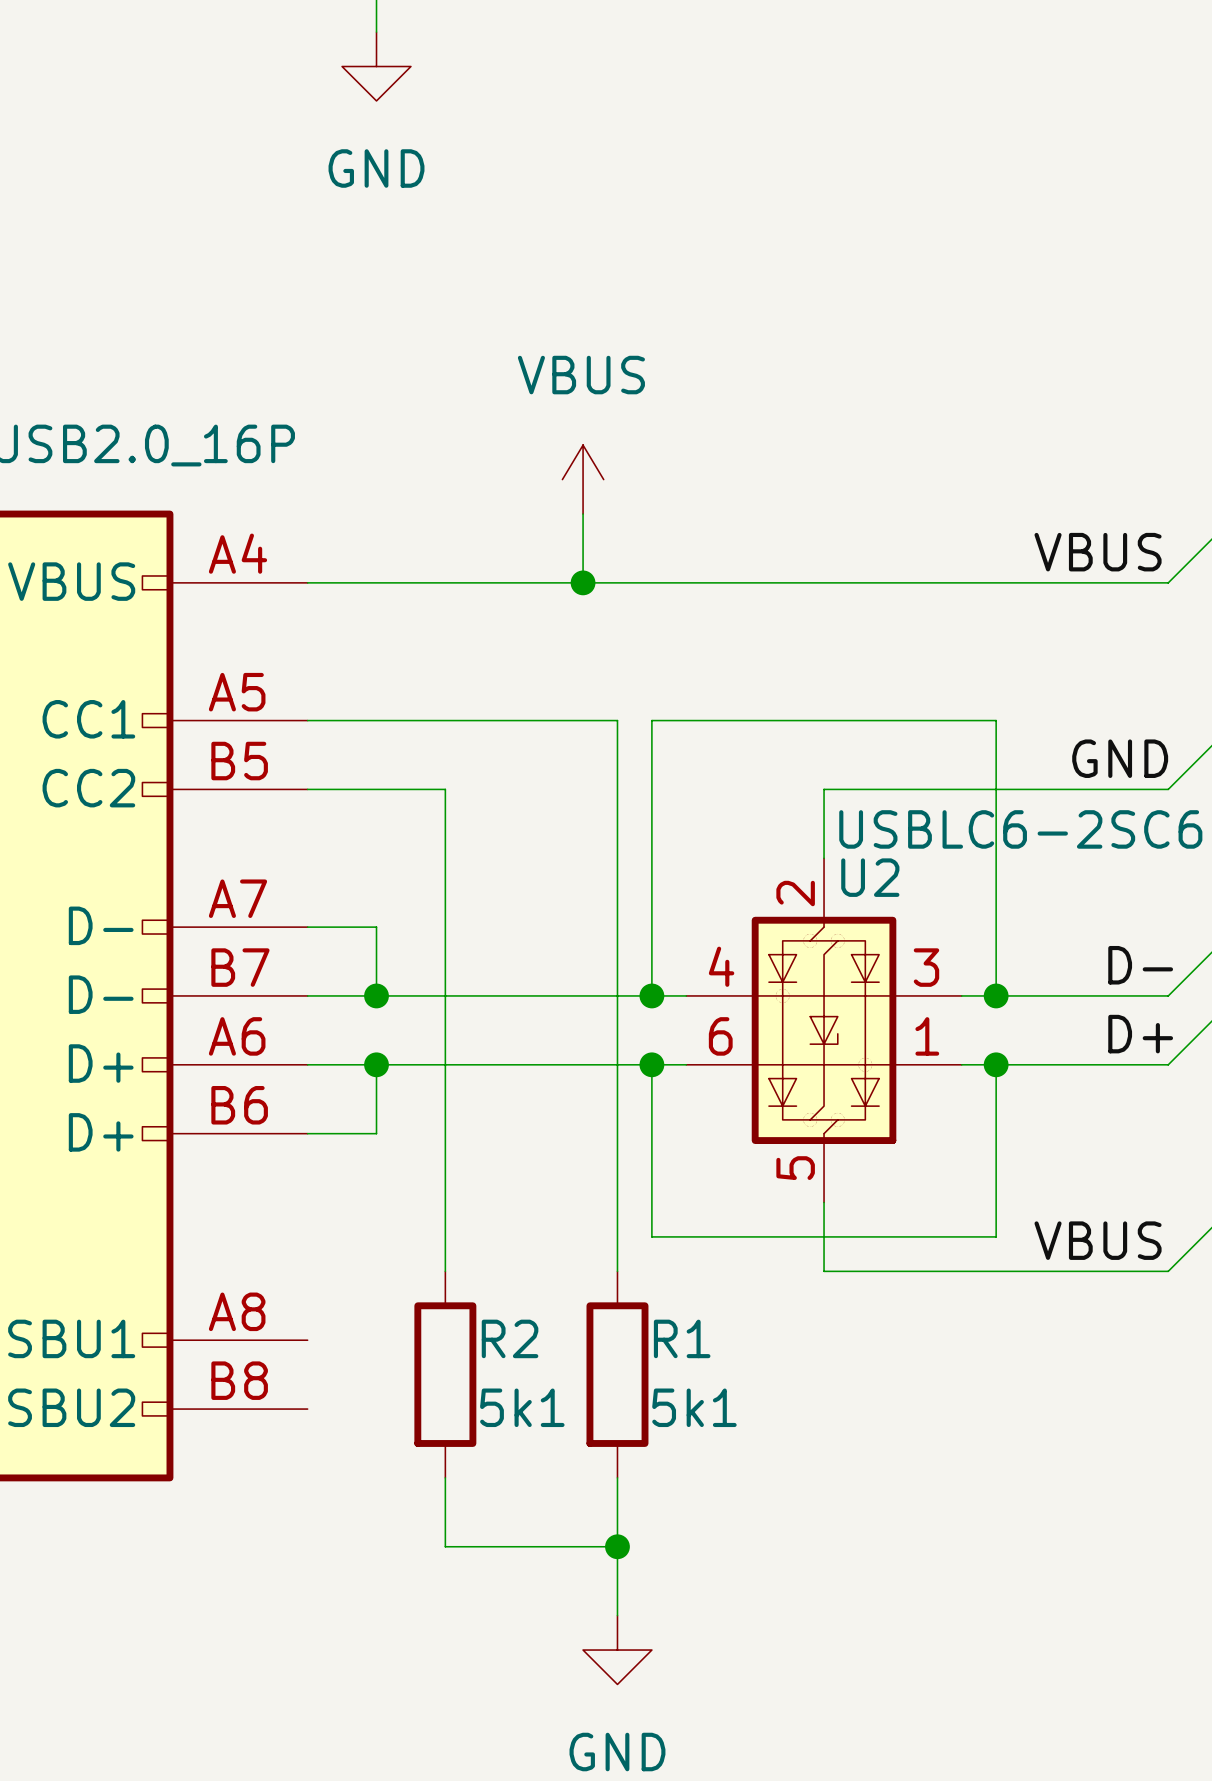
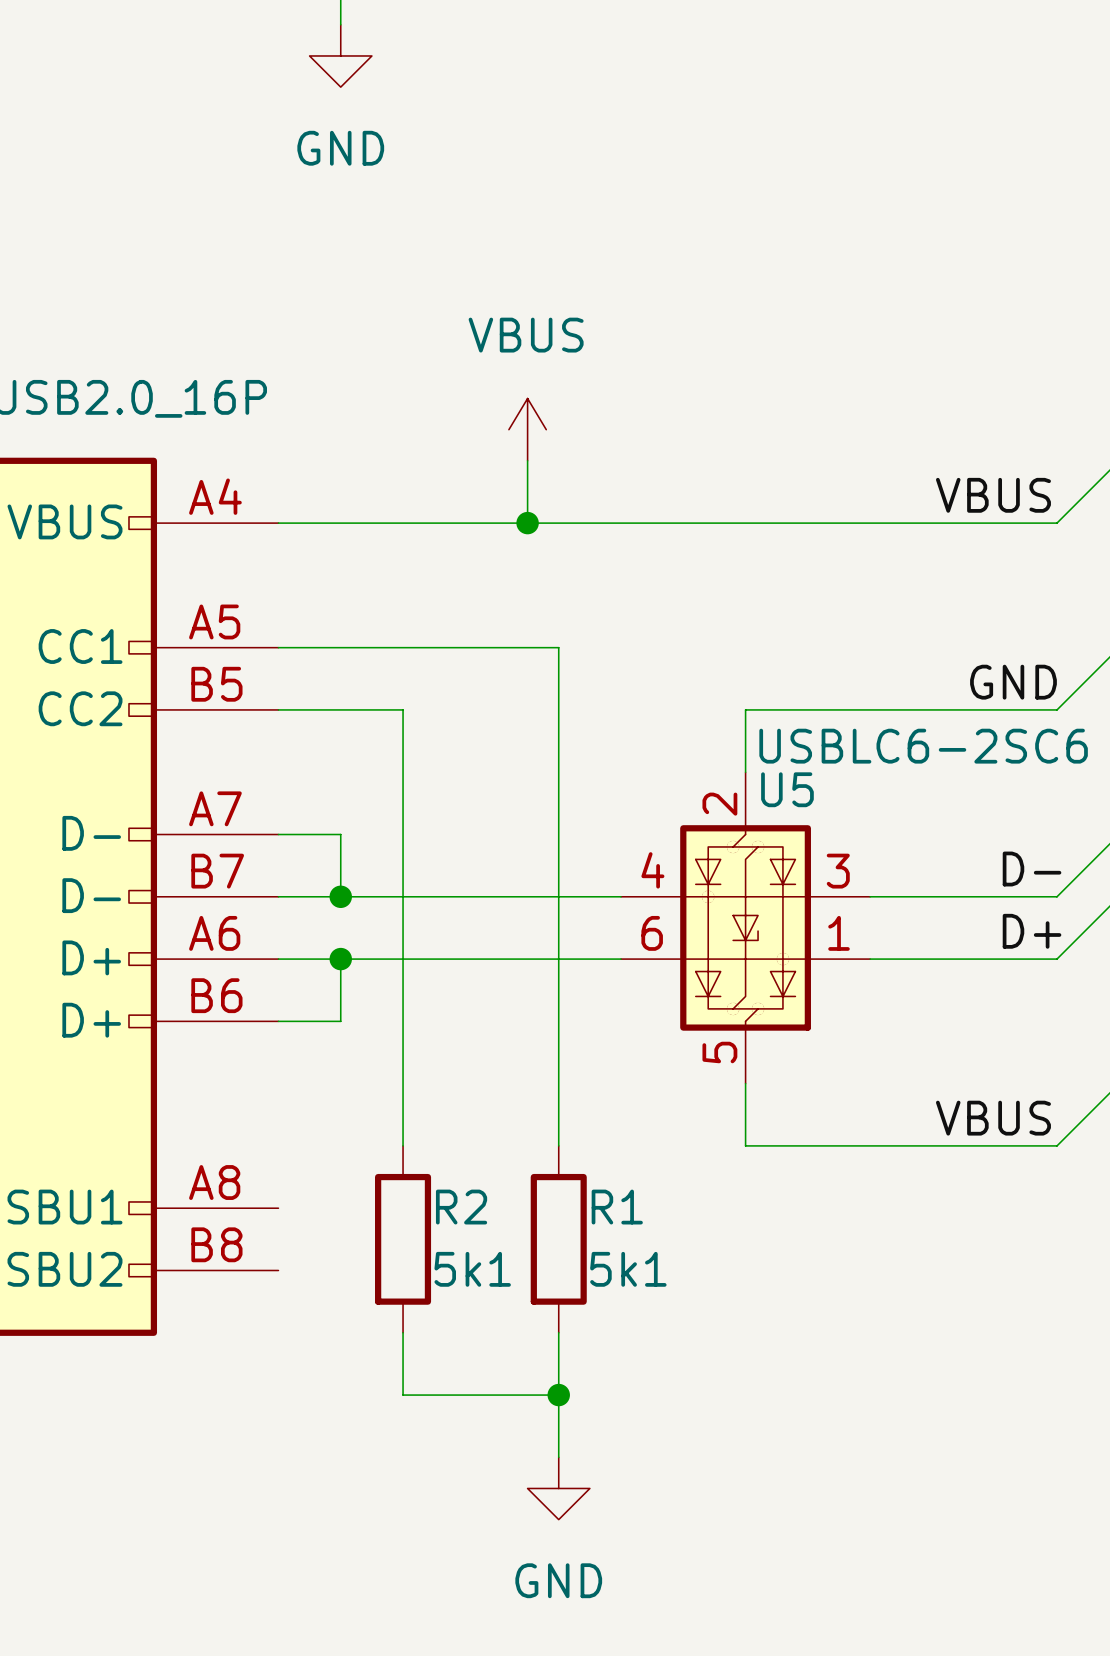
U2 name: U2 (870, 877) -> U5 (787, 789)
wire: (651, 995) (651, 720) (996, 720) (996, 995) -> none
junction: (651, 995) -> none
junction: (996, 995) -> none
wire: (651, 1064) (651, 1236) (996, 1236) (996, 1064) -> none
junction: (651, 1064) -> none
junction: (996, 1064) -> none

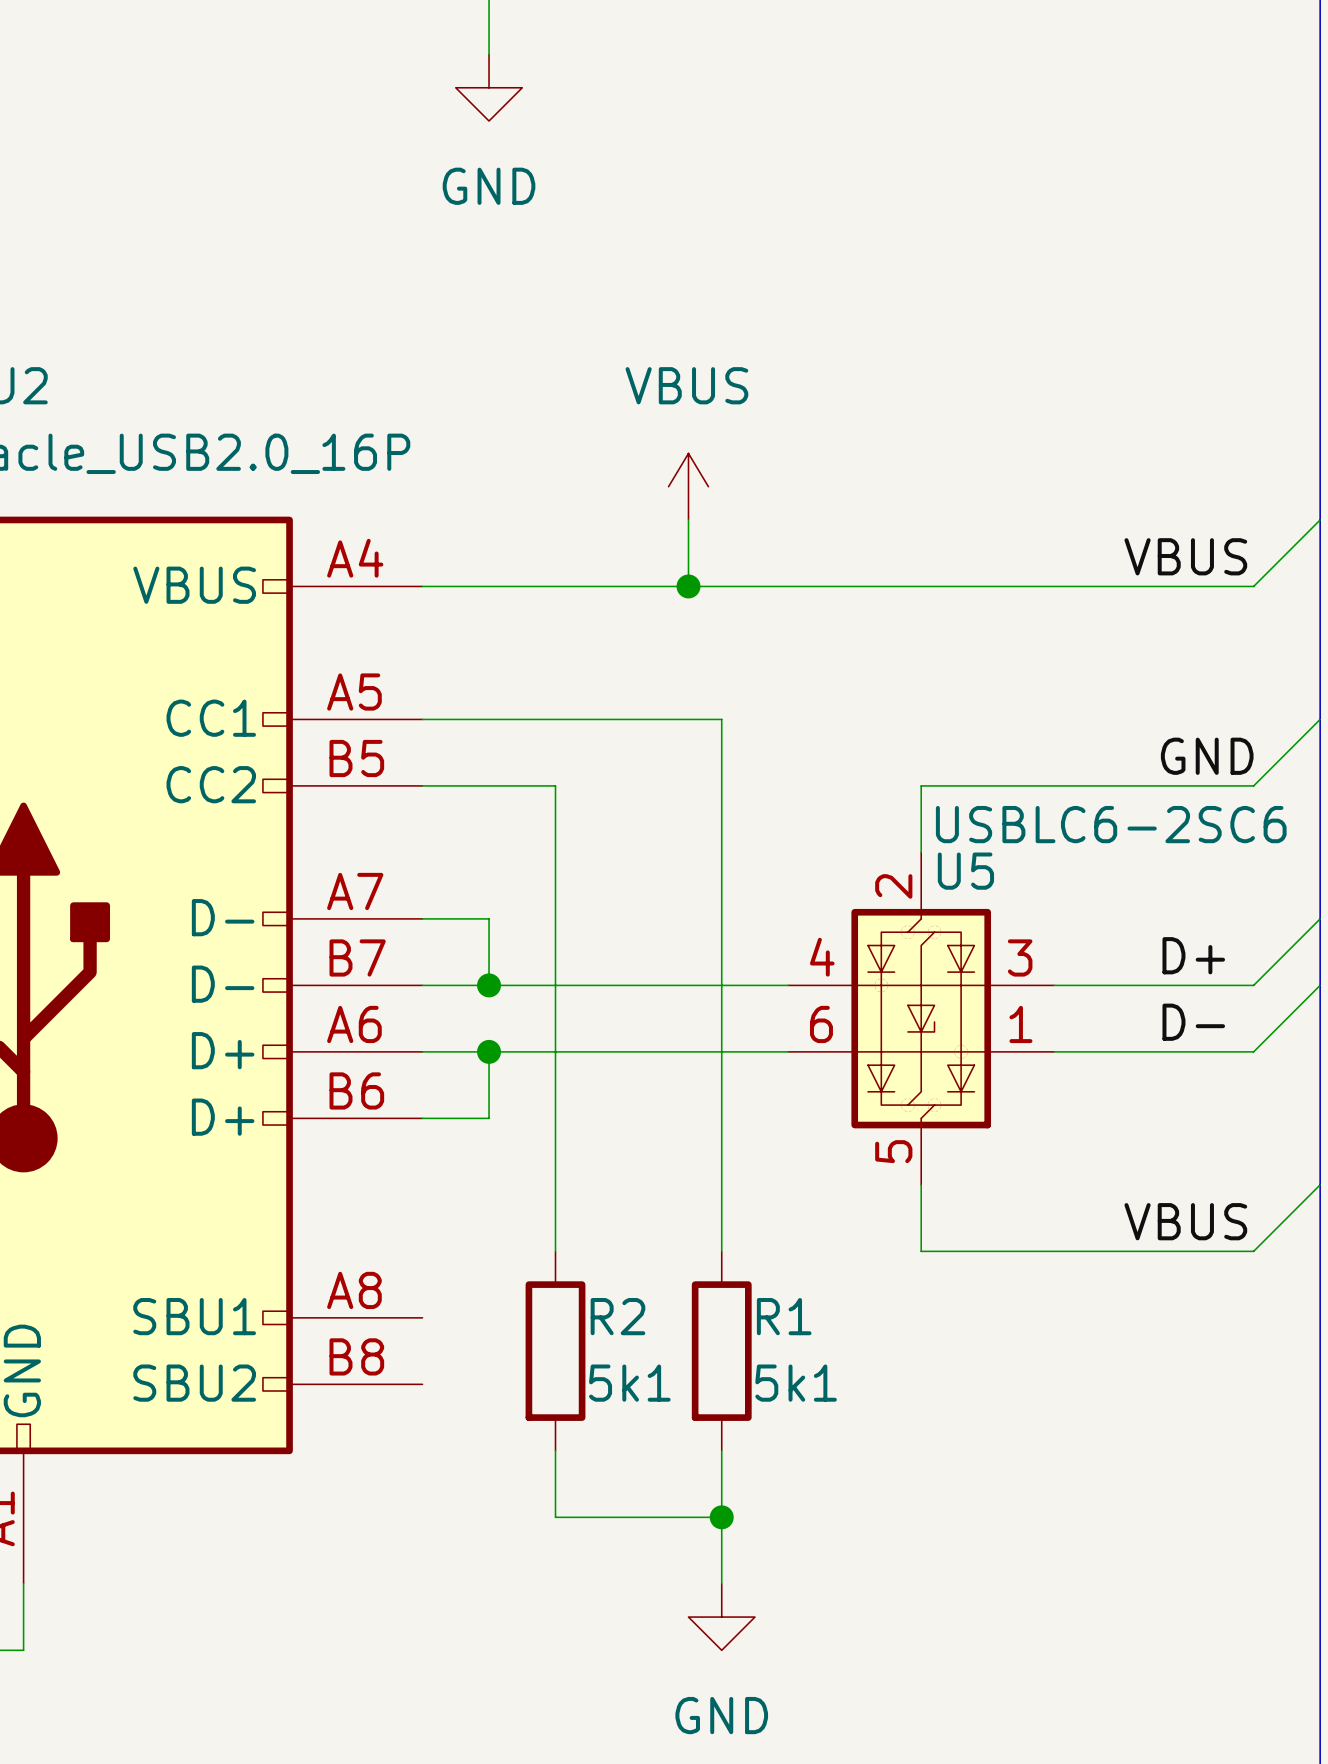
label position: D- (1032, 869) -> D- (1193, 1022)
label position: D+ (1032, 931) -> D+ (1193, 955)

